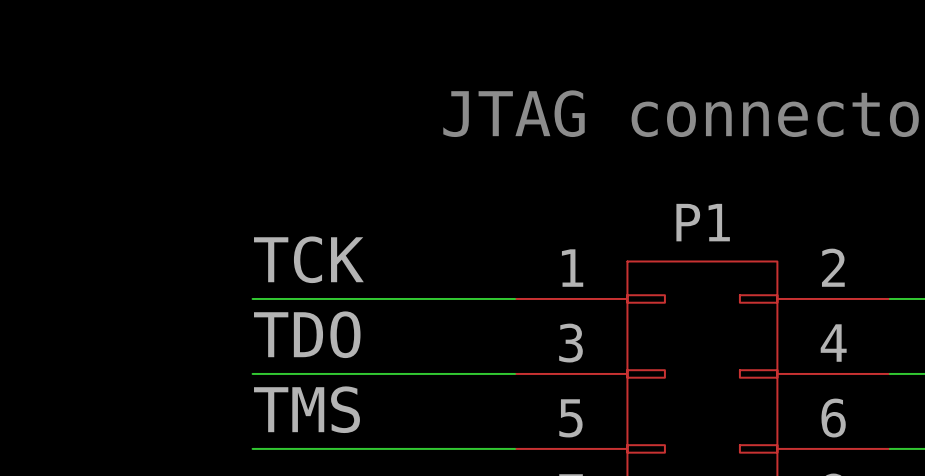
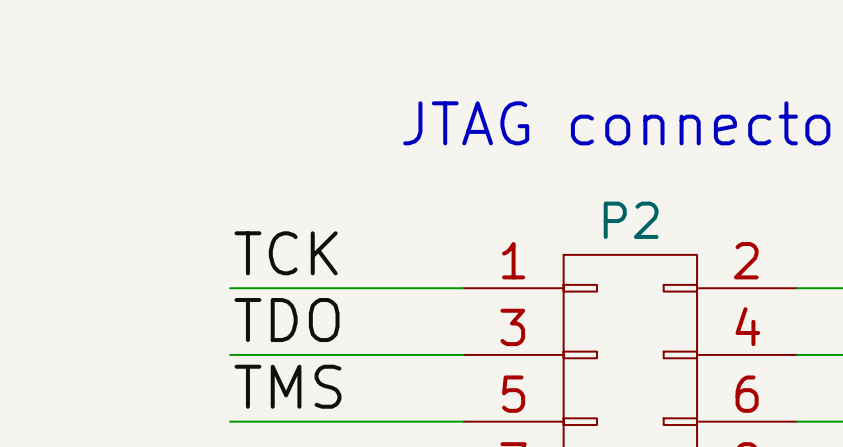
P1 name: P1 (703, 222) -> P2 (631, 220)

